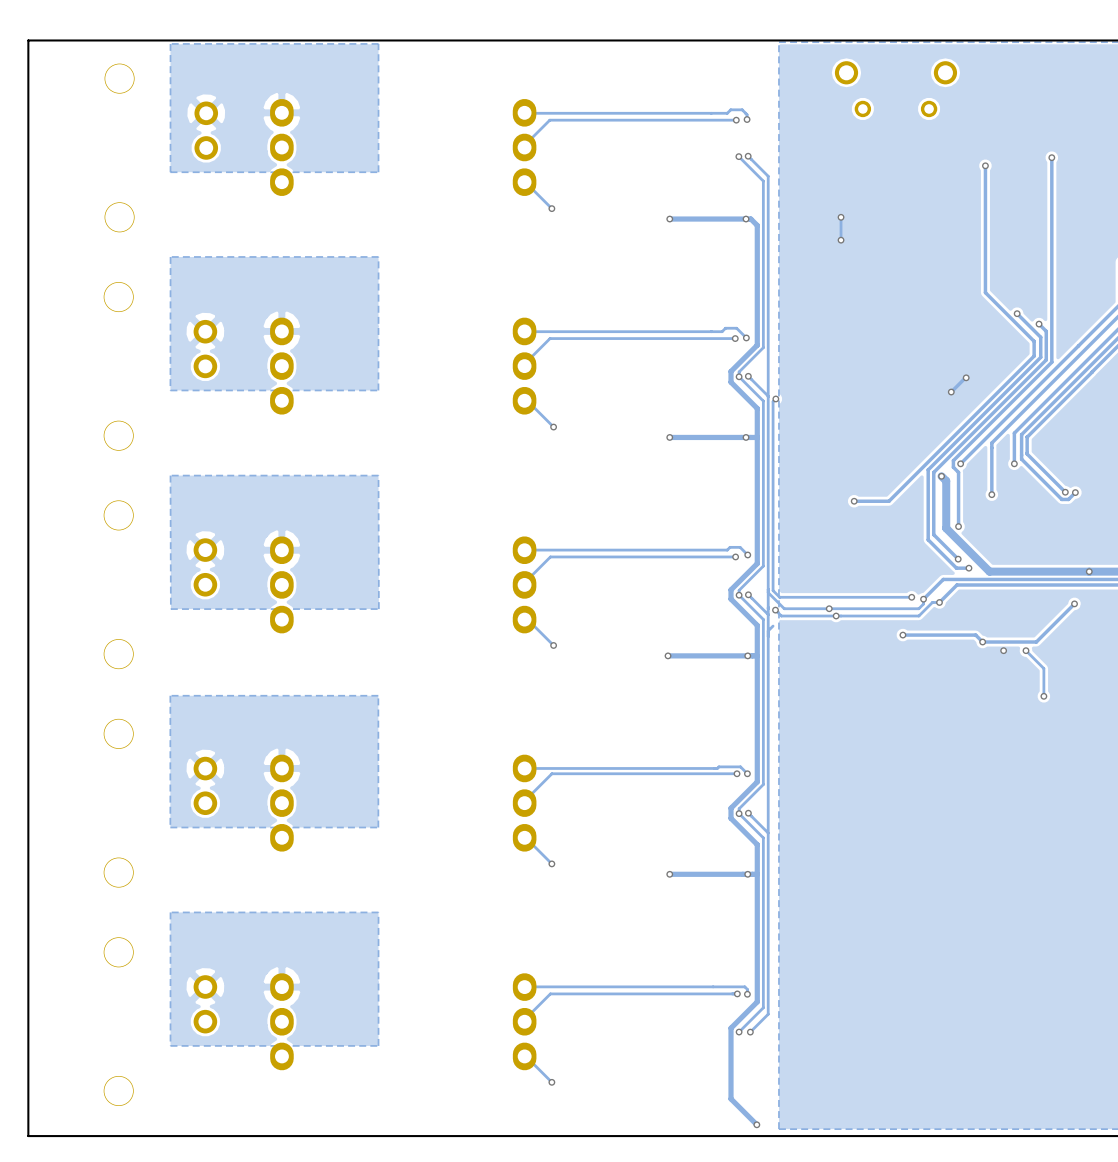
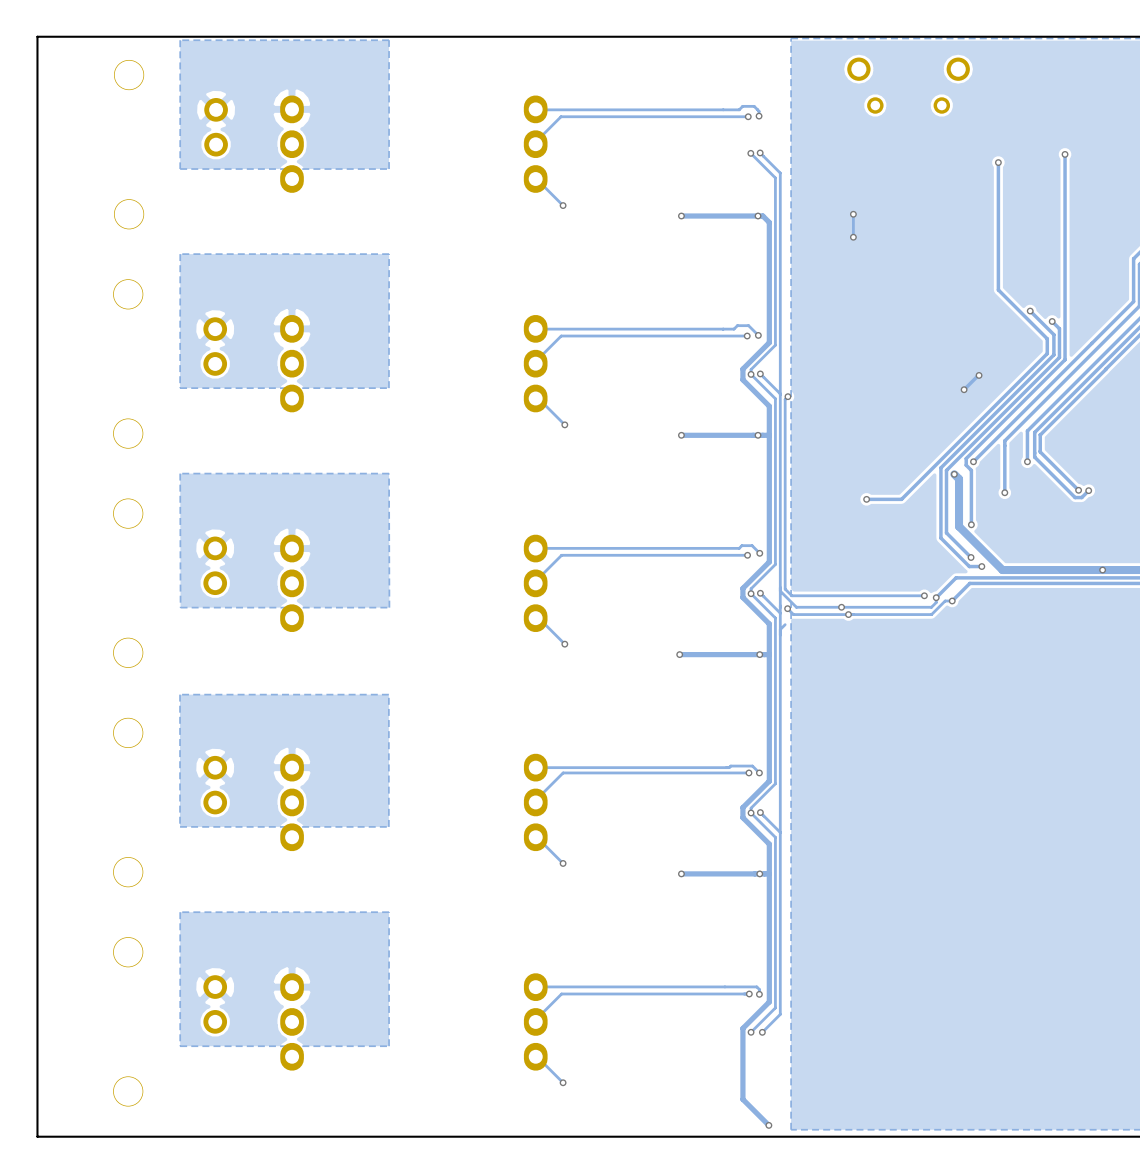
track: (1074, 603) (1036, 642) (982, 642) (975, 635) (902, 635) -> none
via: (1074, 603) -> none
via: (902, 635) -> none
via: (982, 642) -> none
via: (1003, 650) -> none
track: (1025, 650) (1043, 668) (1043, 696) -> none
via: (1025, 650) -> none
via: (1043, 696) -> none

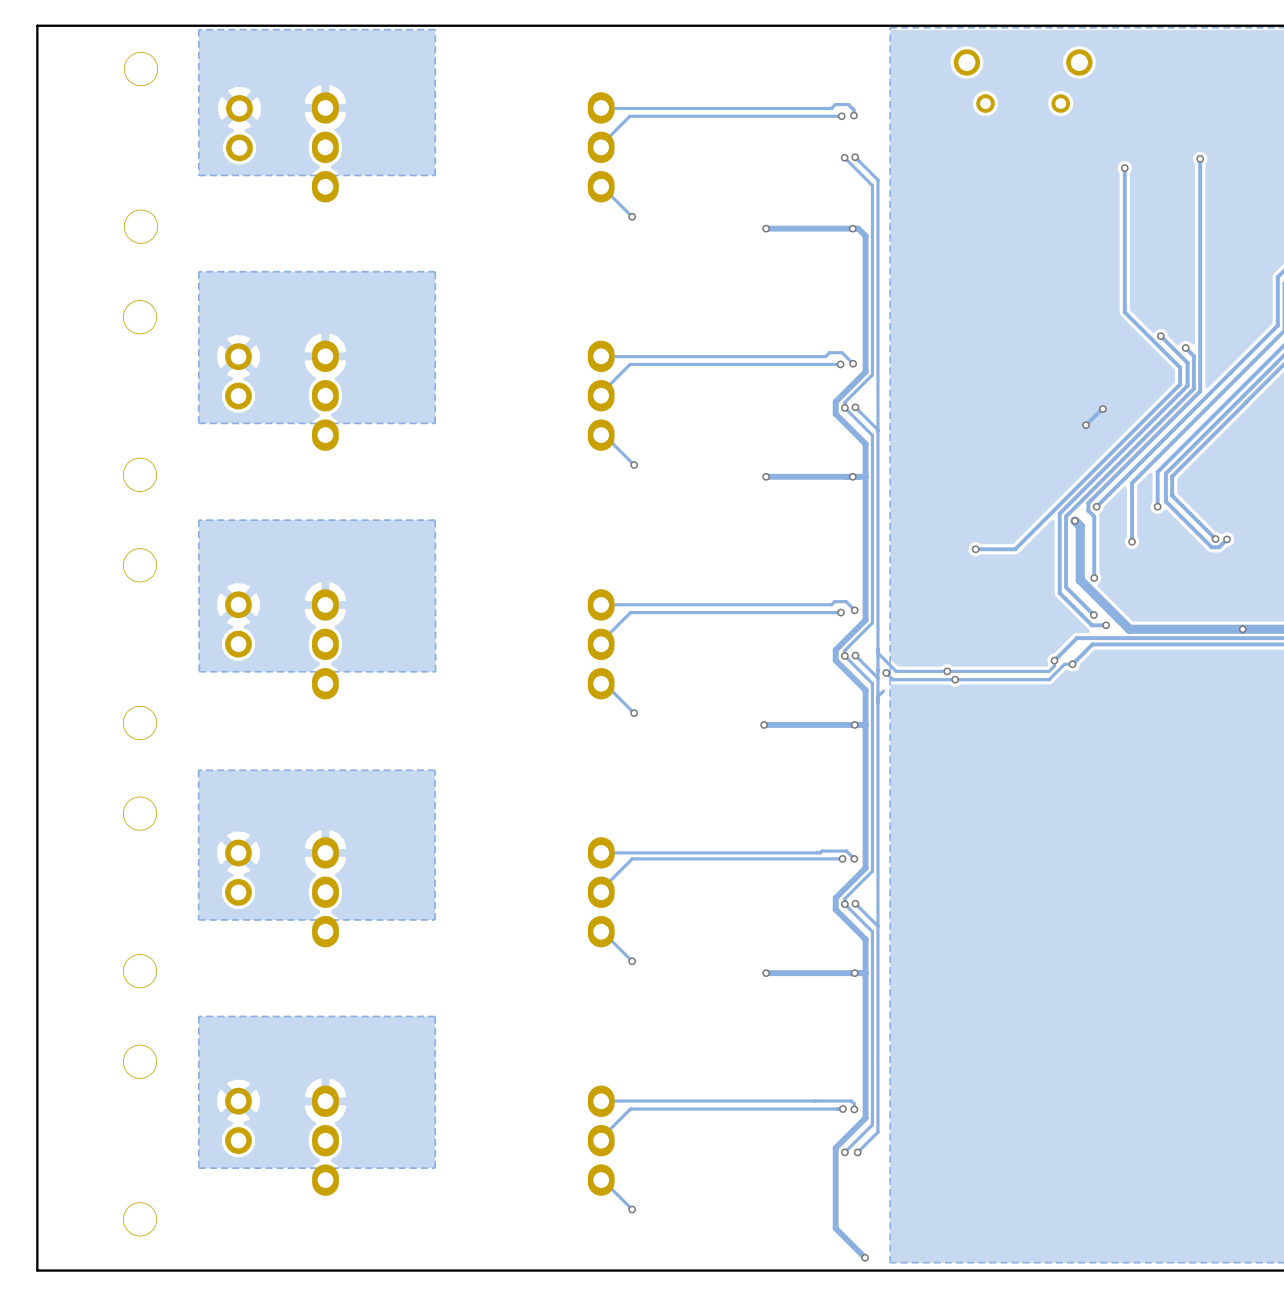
track: (853, 214) (853, 237) -> none
via: (853, 214) -> none
via: (853, 237) -> none
track: (787, 396) (785, 399) (785, 589) (791, 595) (924, 595) -> none
via: (787, 396) -> none
via: (924, 595) -> none

